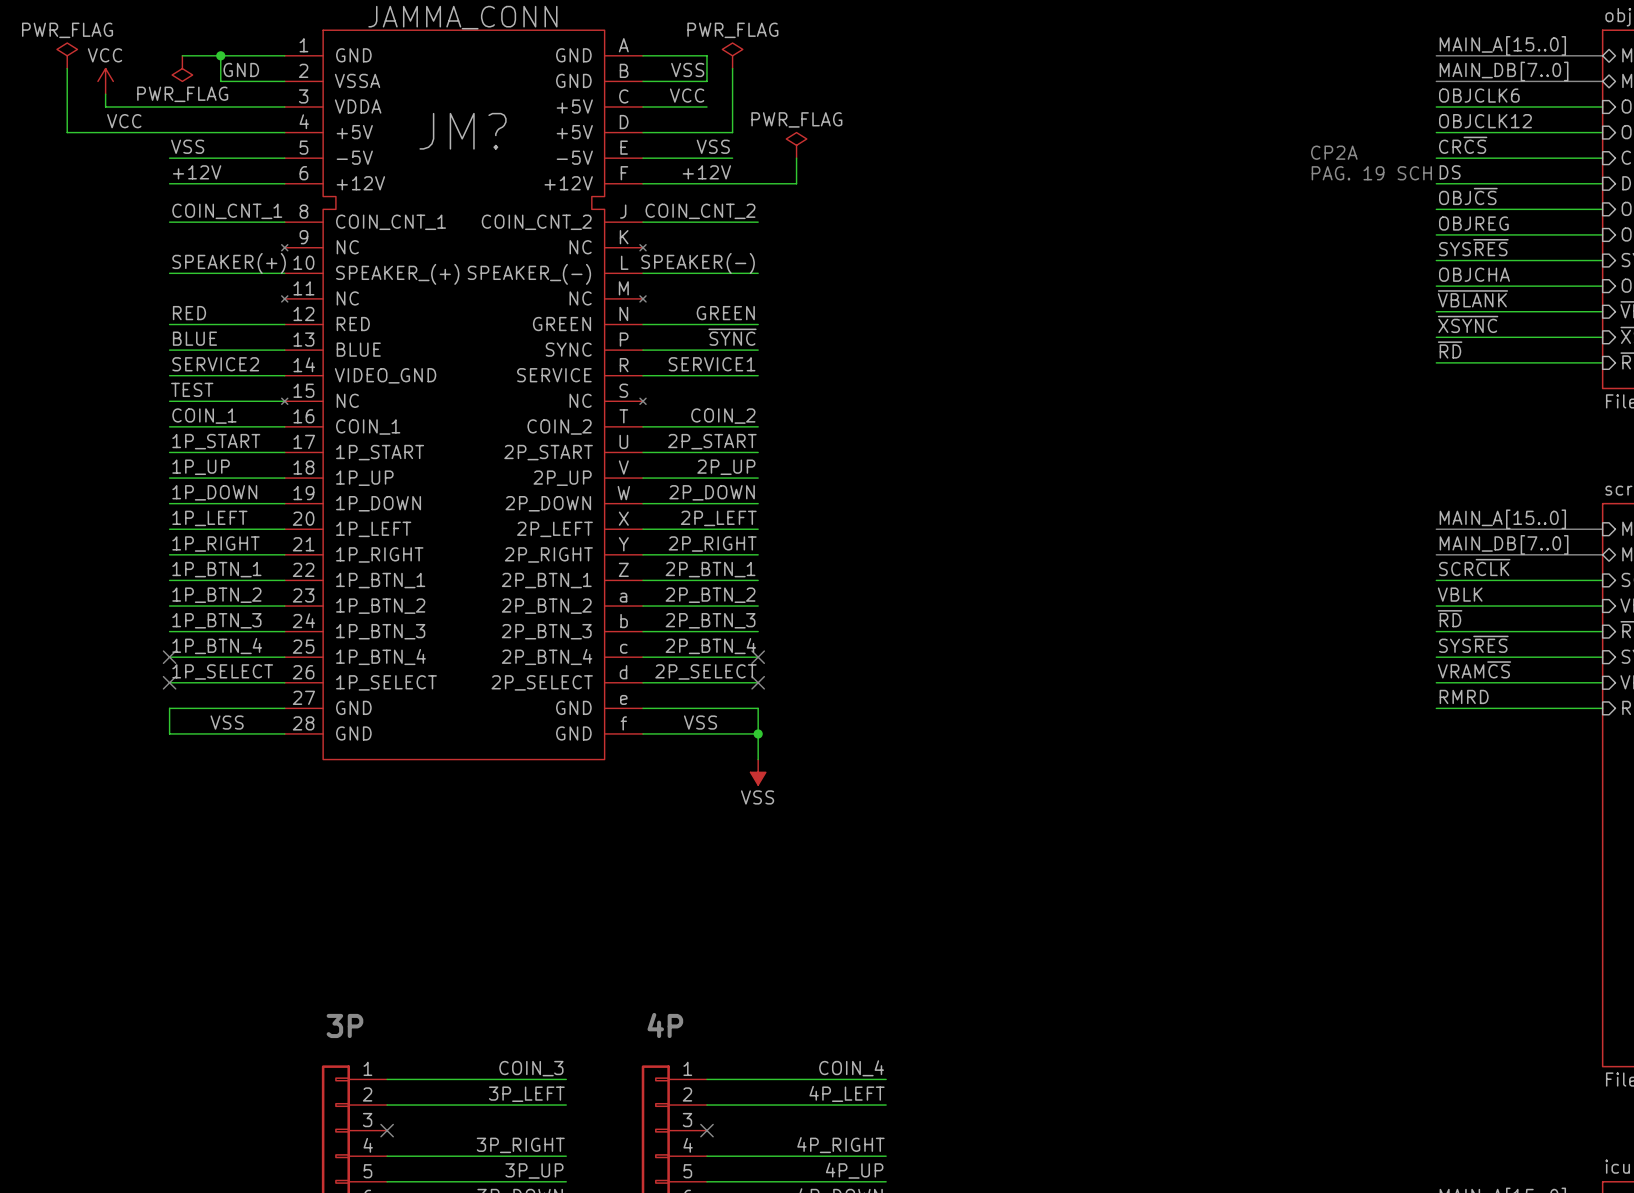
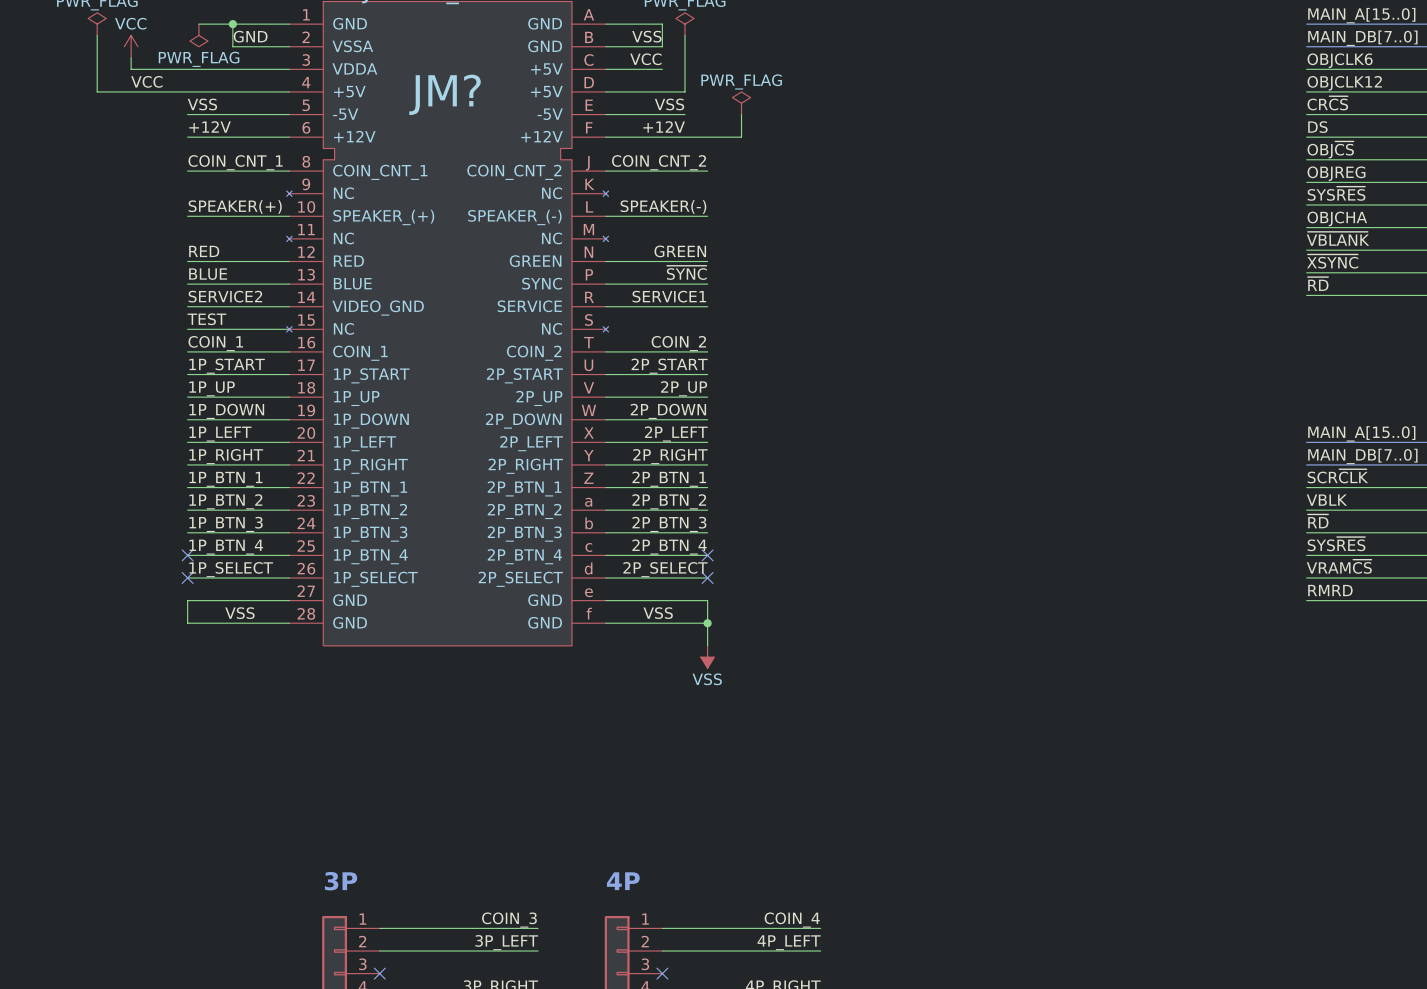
text: CP2A (1334, 152) -> none
text: PAG. 19 SCH (1371, 173) -> none

